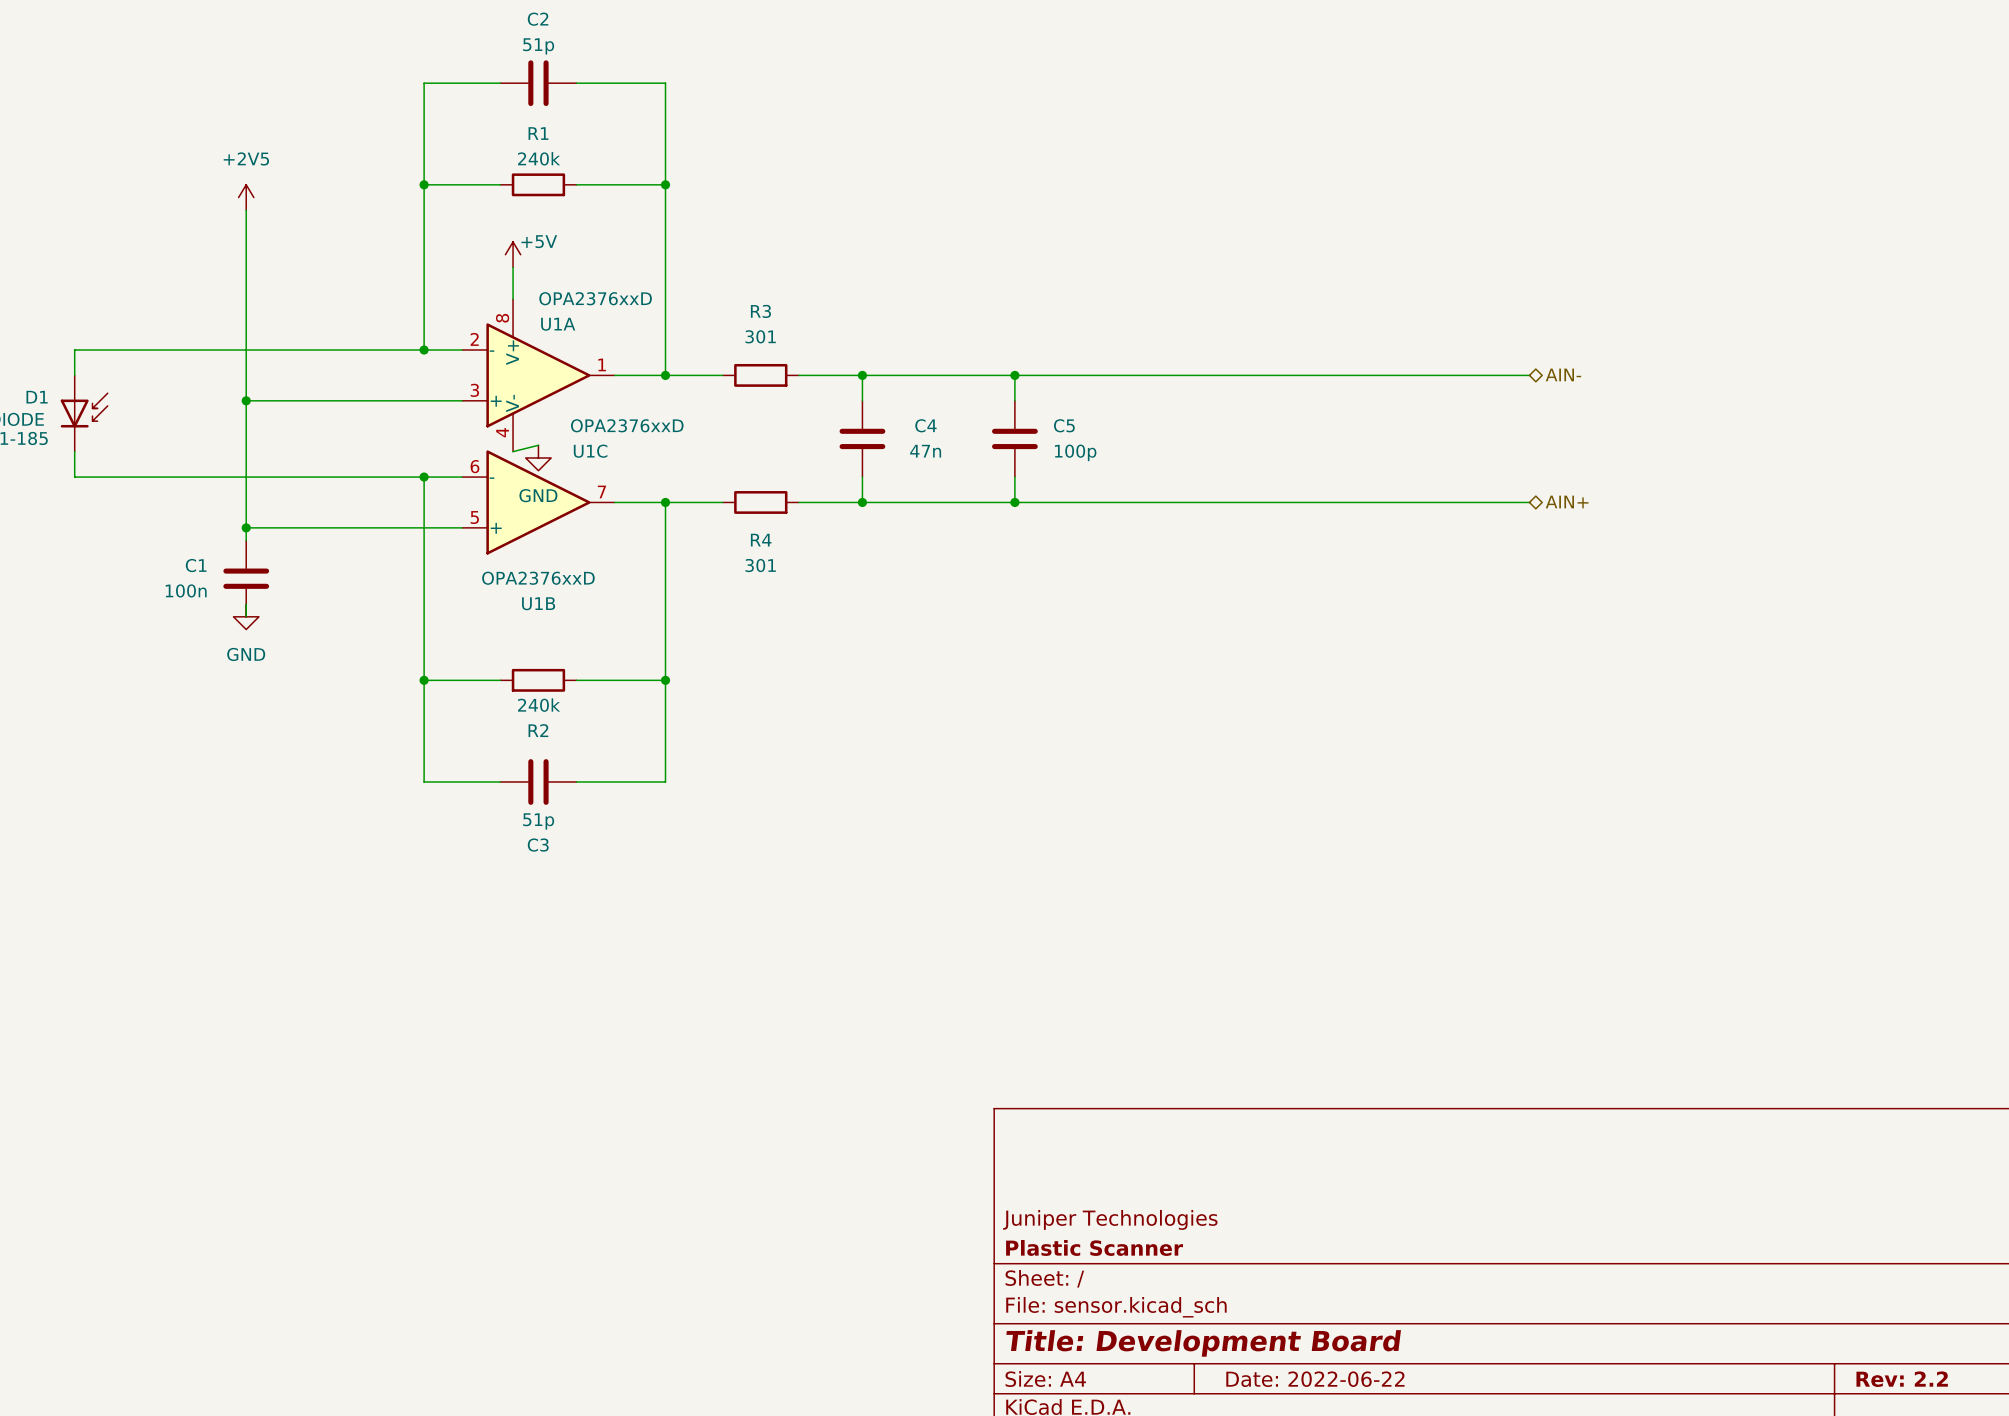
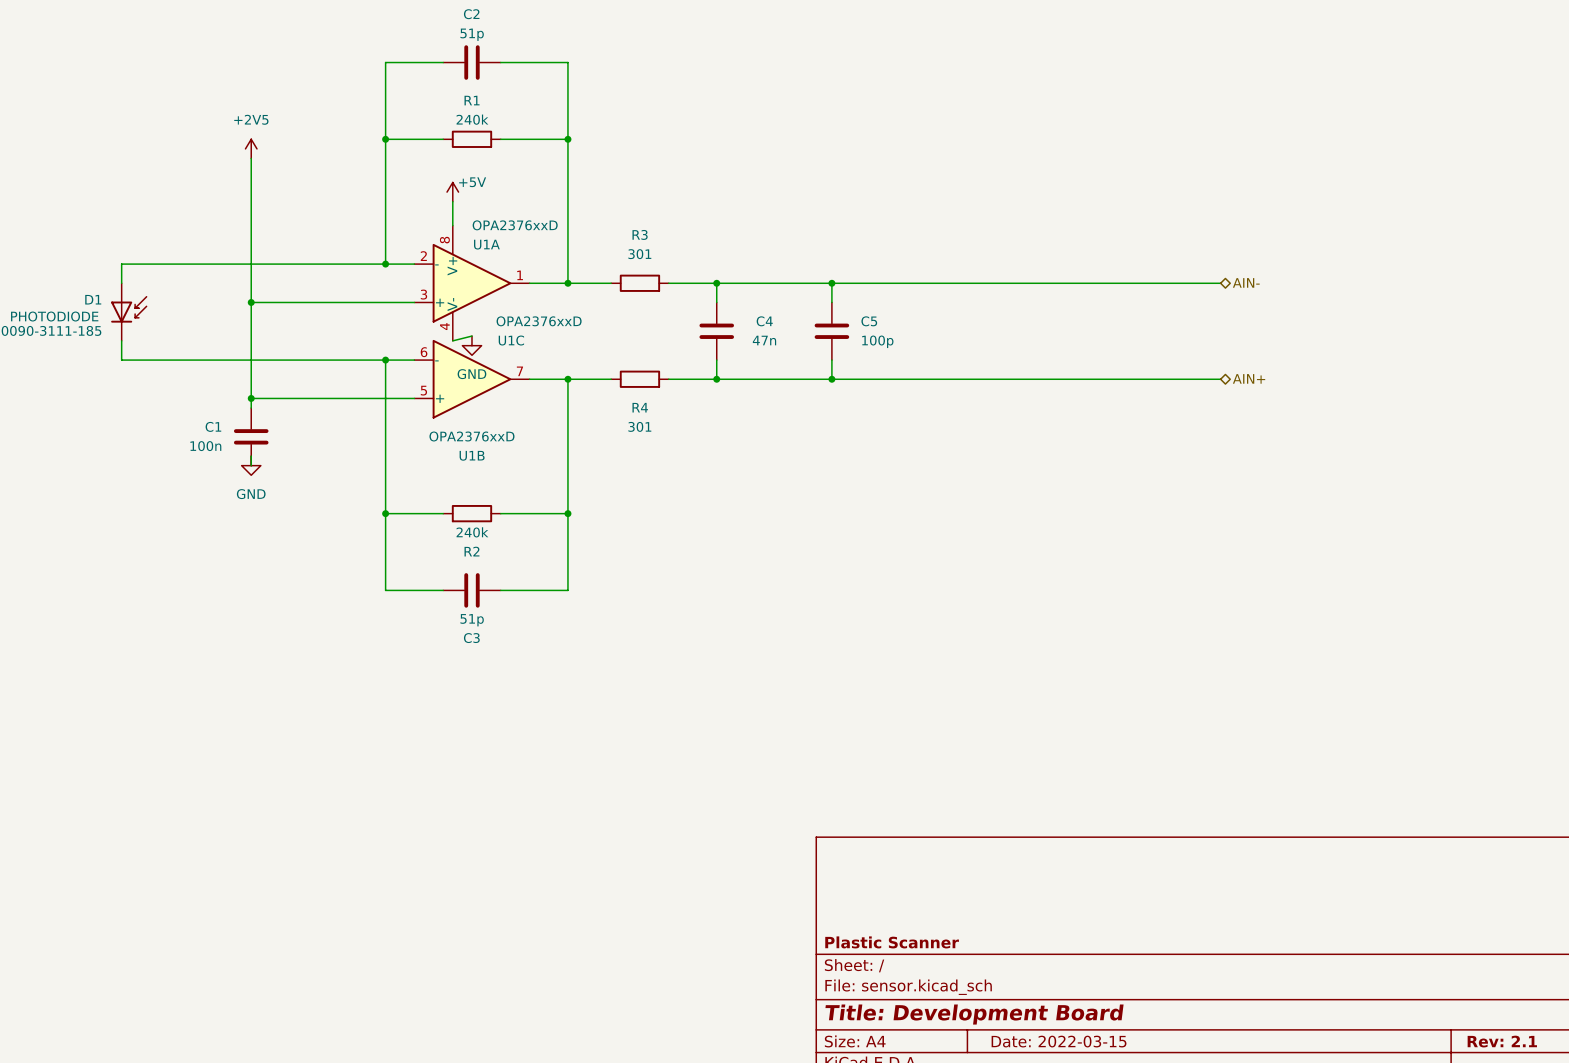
title block: Juniper Technologies (1110, 1219) -> none
title block: Date: 2022-06-22 (1315, 1379) -> Date: 2022-03-15 (1059, 1041)
title block: Rev: 2.2 (1902, 1379) -> Rev: 2.1 (1502, 1041)

